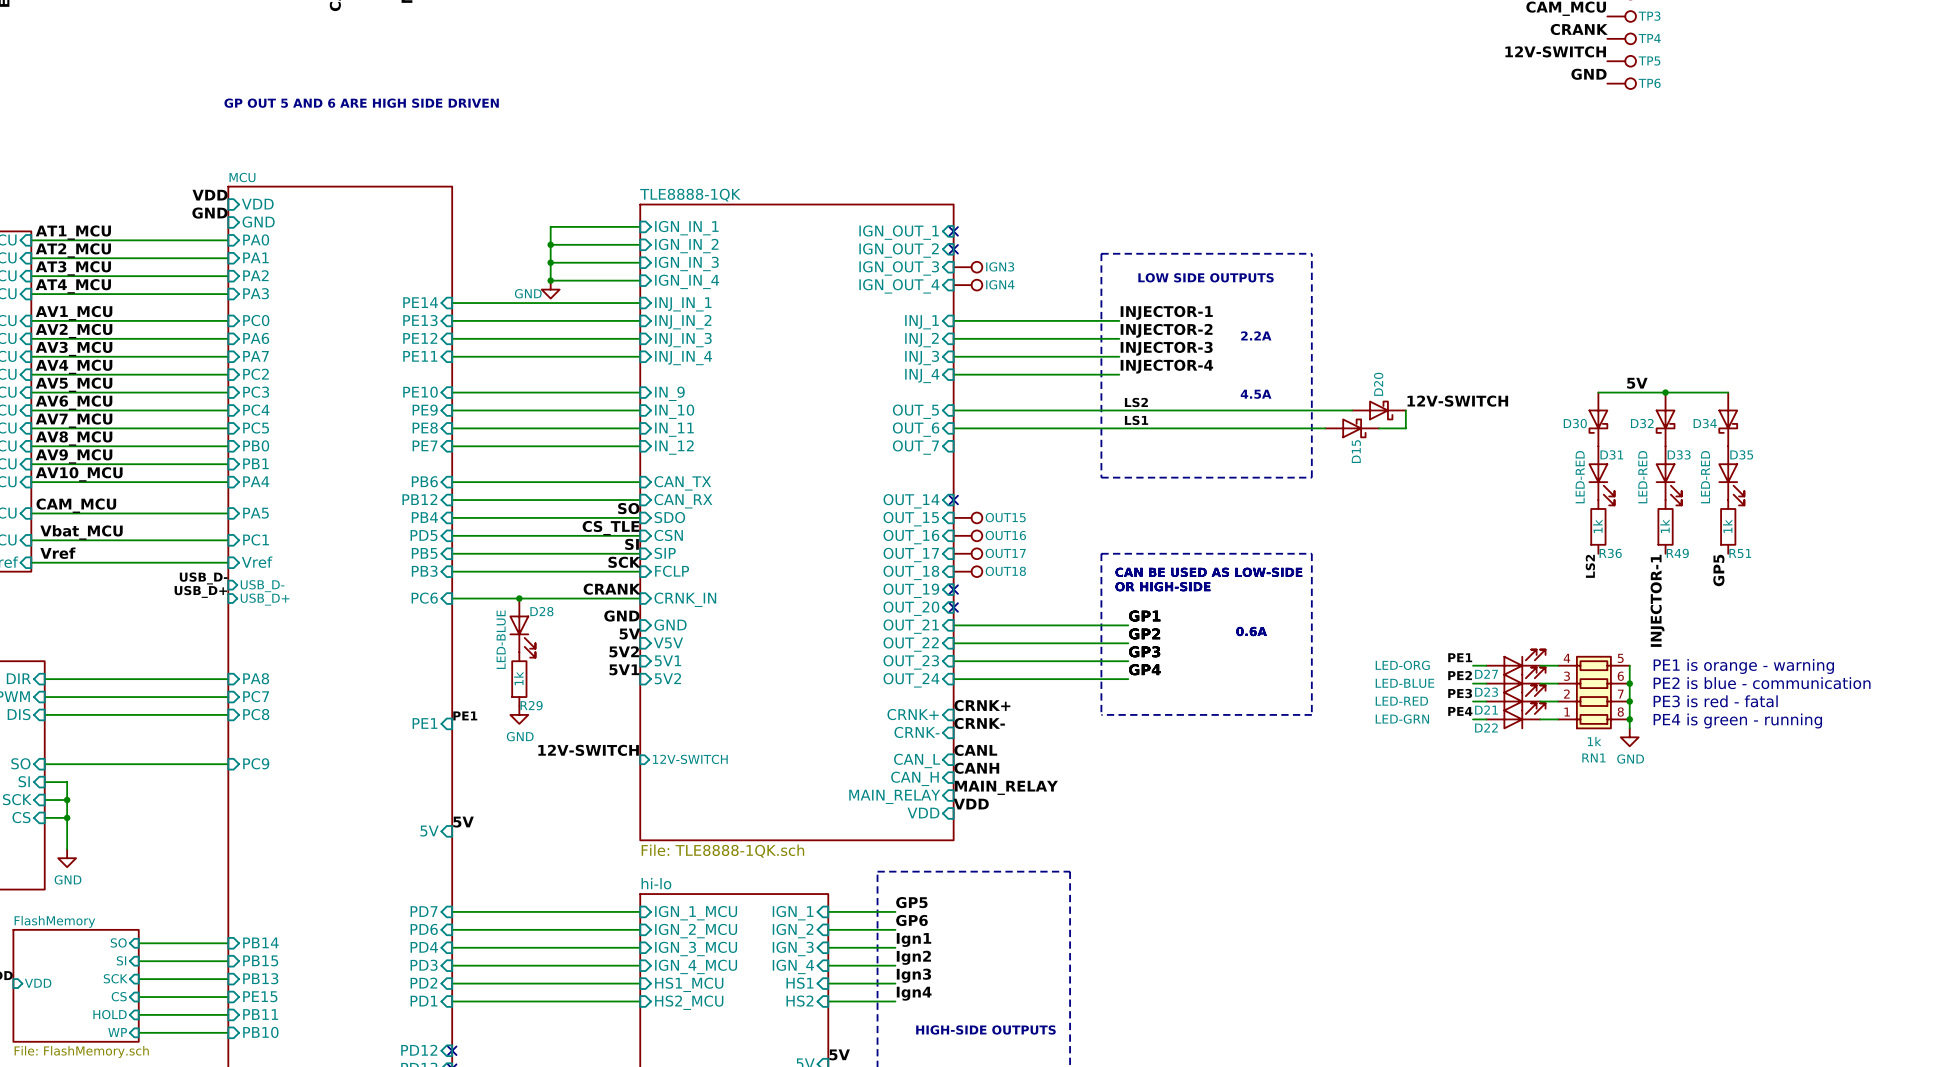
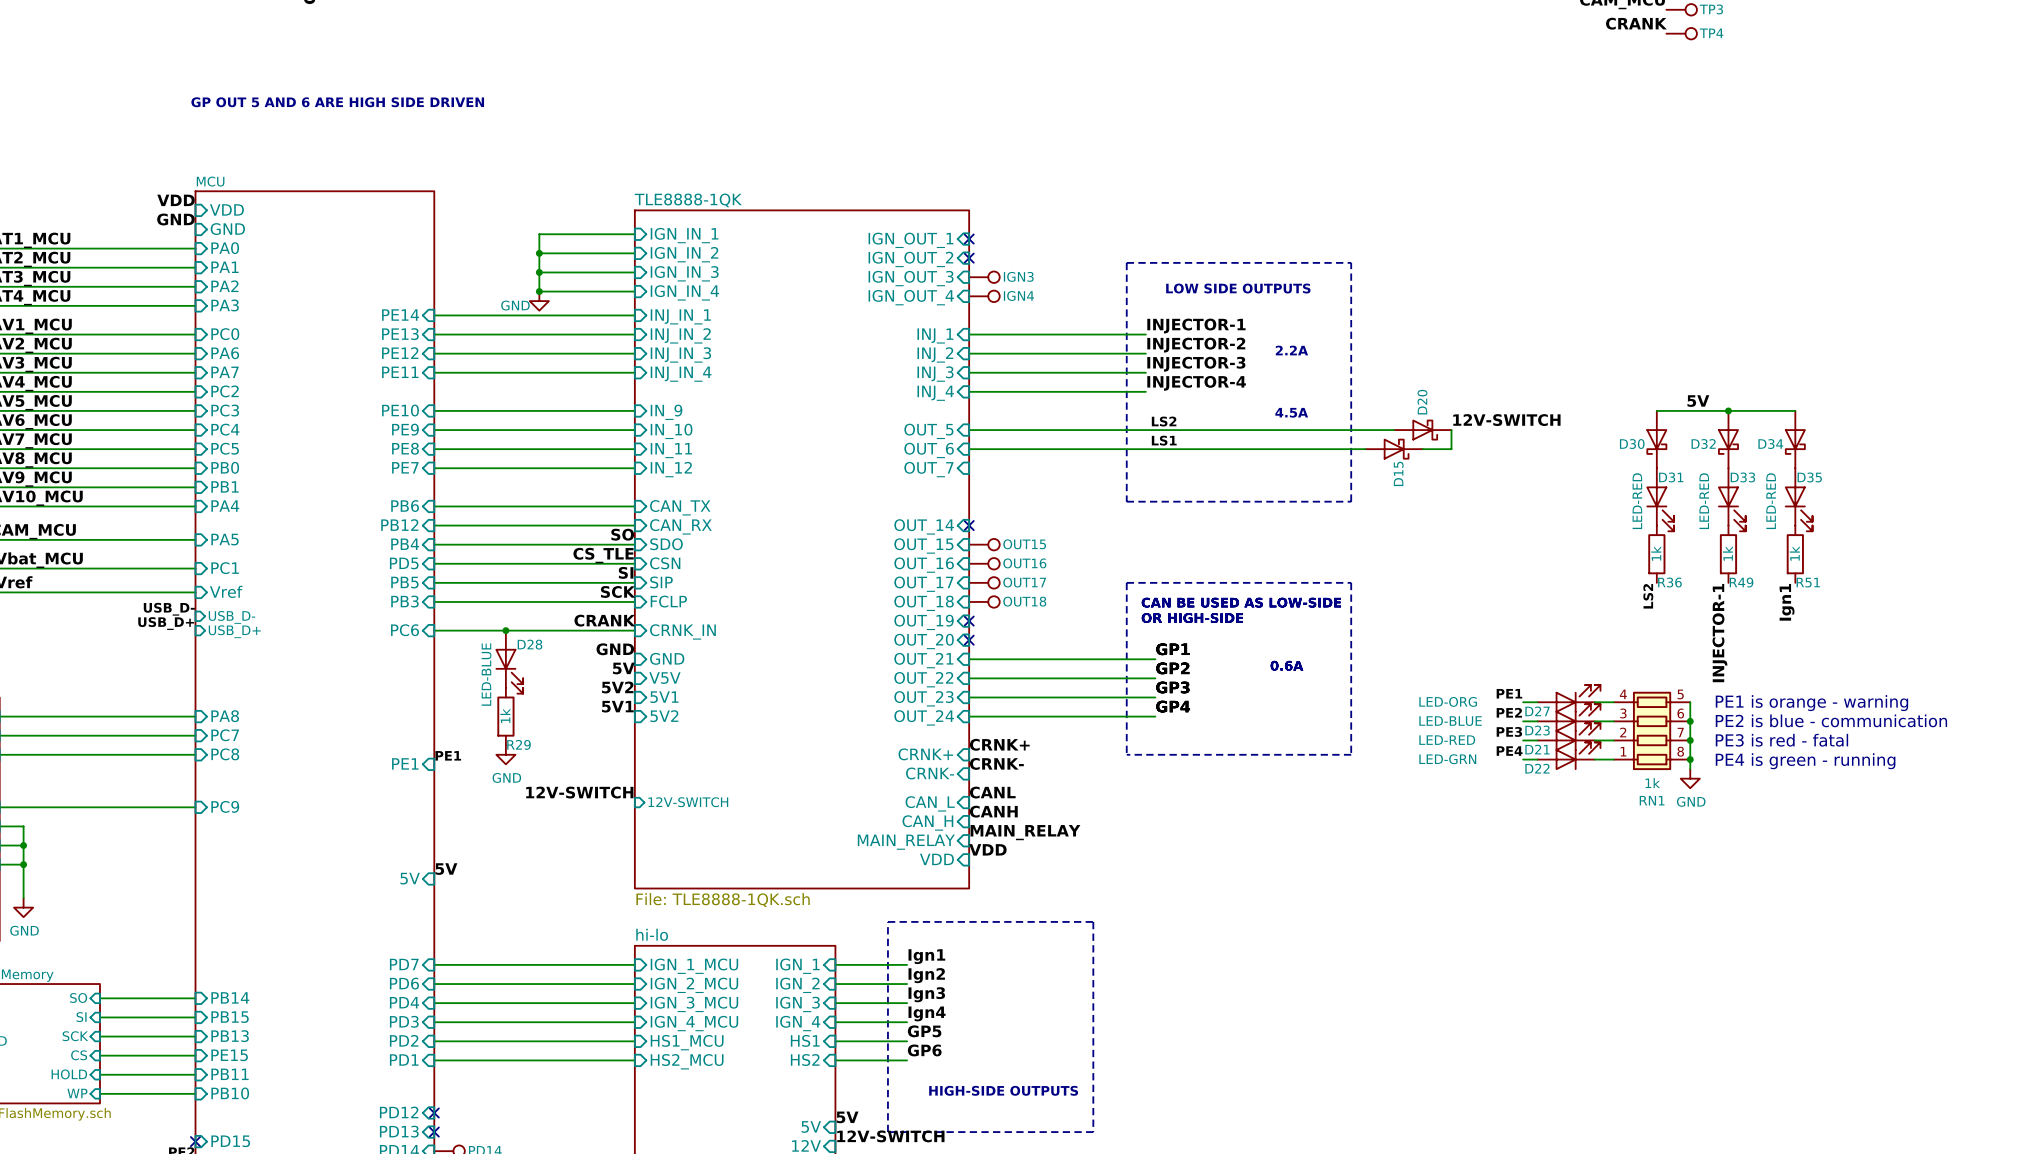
label: 12V-SWITCH (1555, 51) -> none
TP5: (1621, 61) -> none
label: GND (1588, 74) -> none
TP6: (1621, 83) -> none
label: GP5 (1718, 570) -> Ign1 (1787, 602)
label: GP5 (911, 902) -> Ign1 (926, 956)
label: GP6 (911, 920) -> Ign2 (926, 975)
label: Ign1 (914, 939) -> Ign3 (926, 994)
label: Ign2 (913, 957) -> Ign4 (927, 1013)
label: Ign3 (913, 975) -> GP5 (924, 1031)
label: Ign4 (914, 993) -> GP6 (924, 1050)

